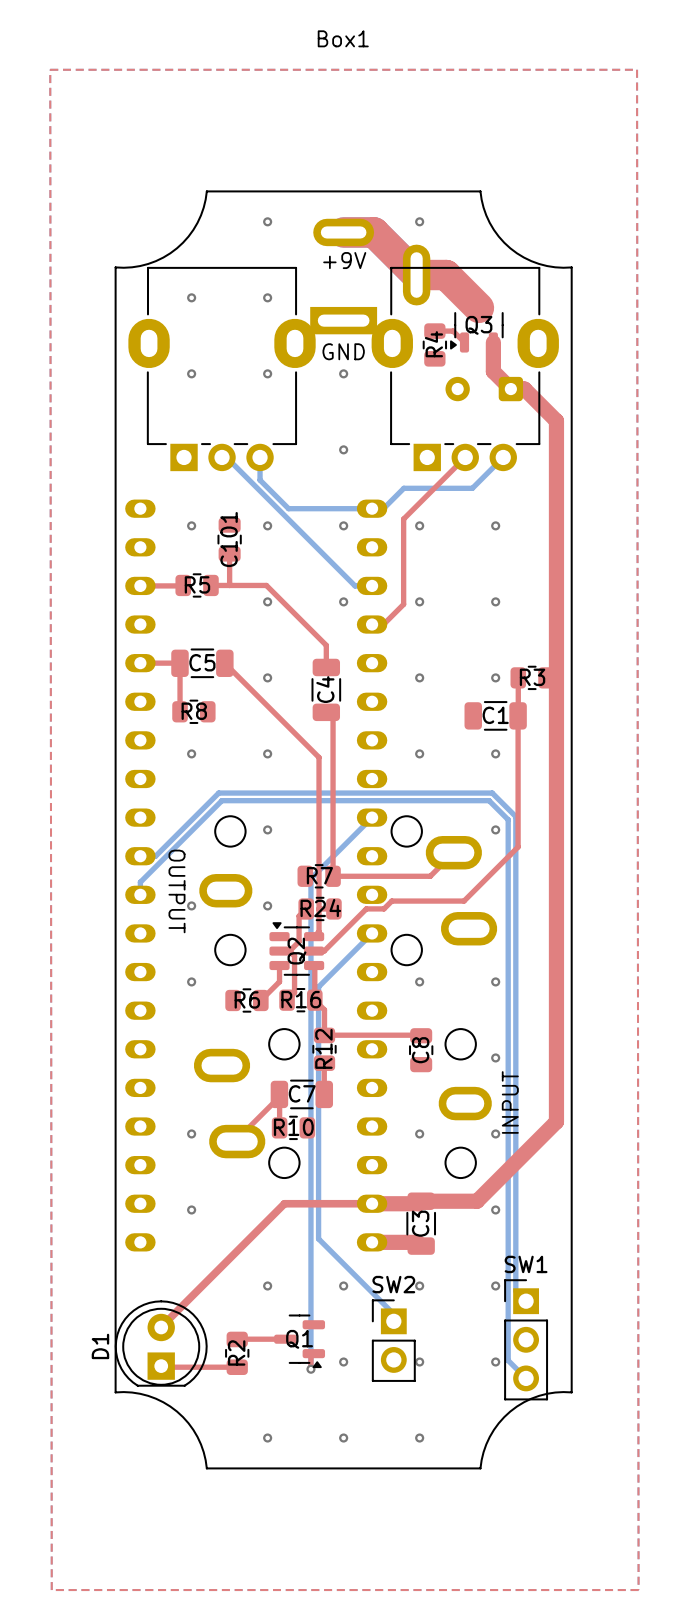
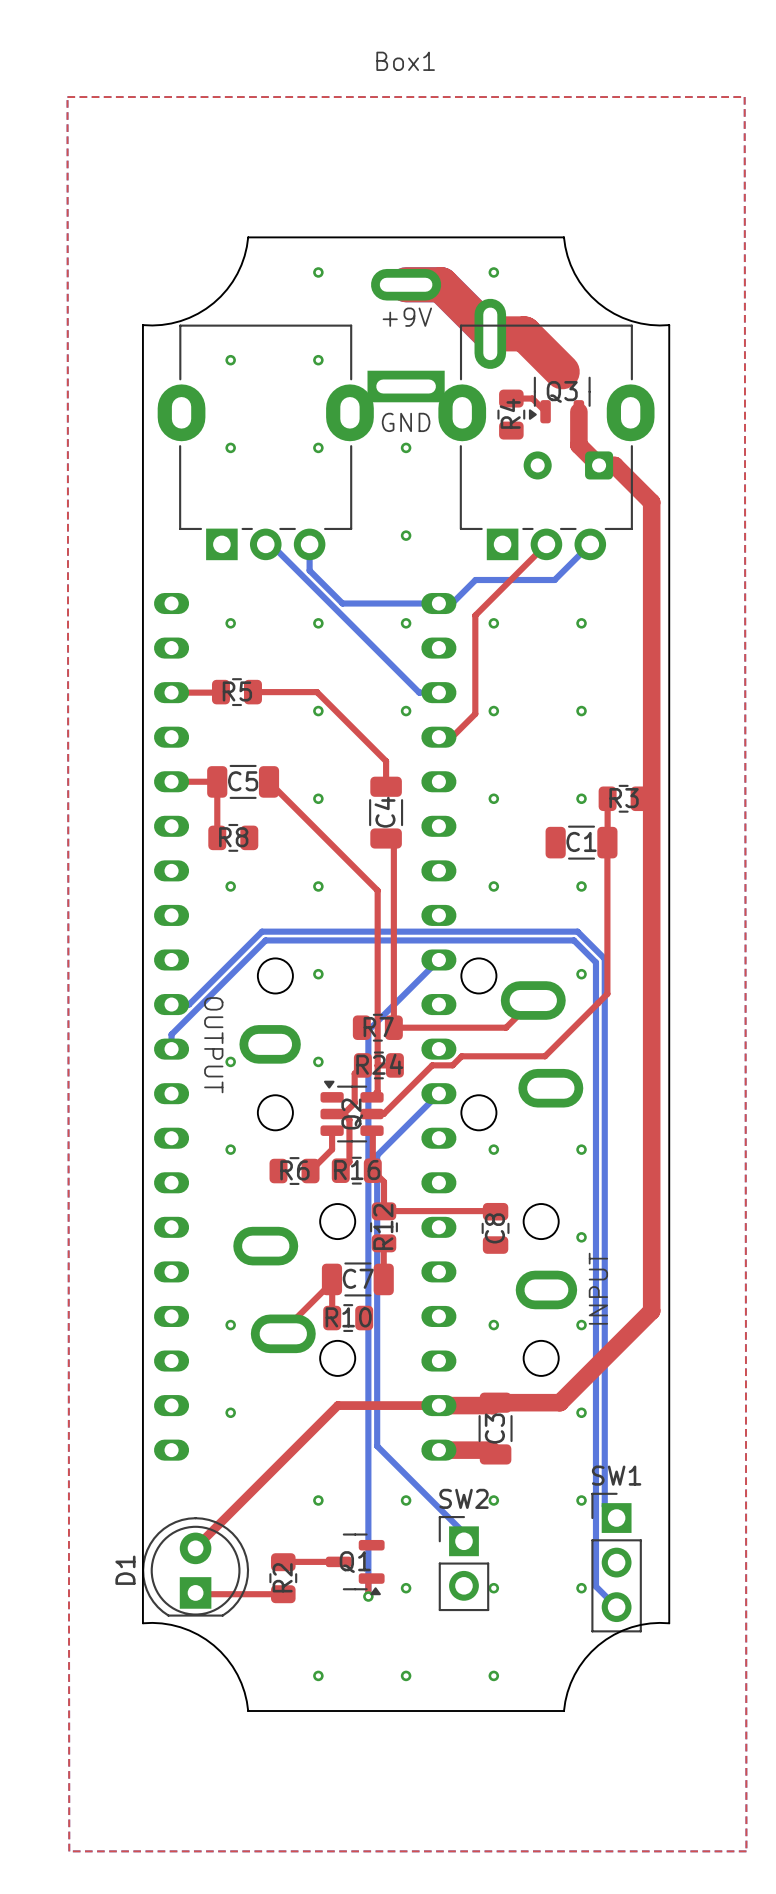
C101: (229, 539) -> none
top track: (229, 553) (229, 585) -> none

